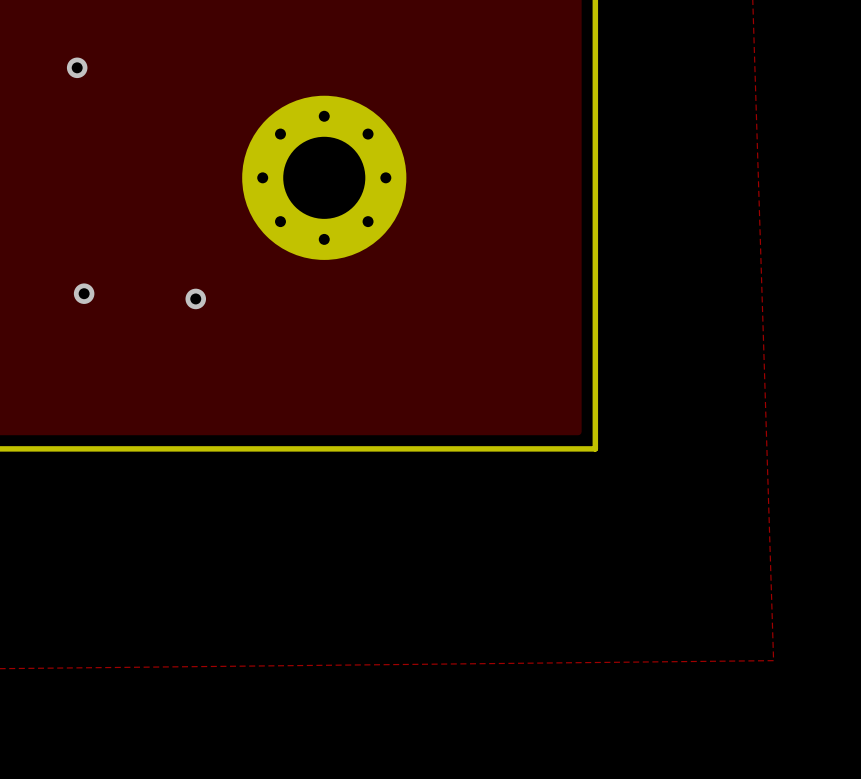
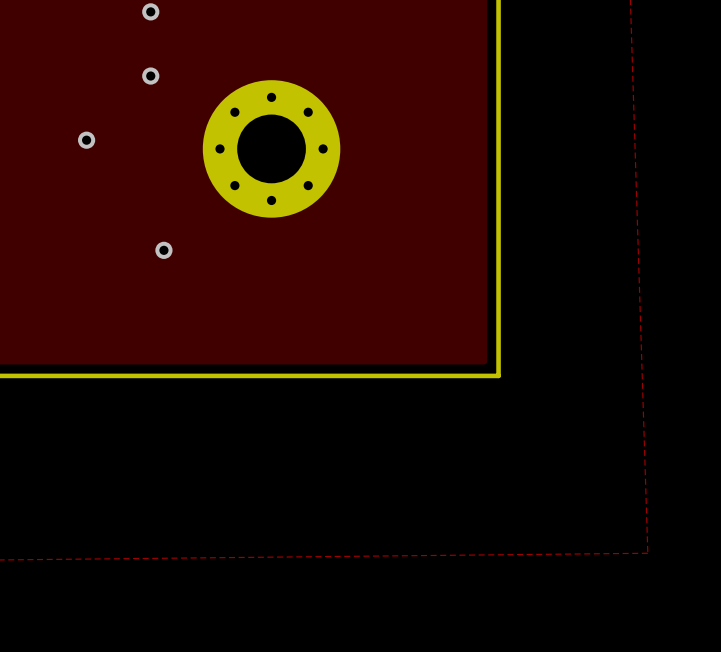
via: none -> (150, 11)
via: (77, 67) -> none
via: none -> (150, 76)
via: none -> (86, 140)
via: (84, 293) -> none

